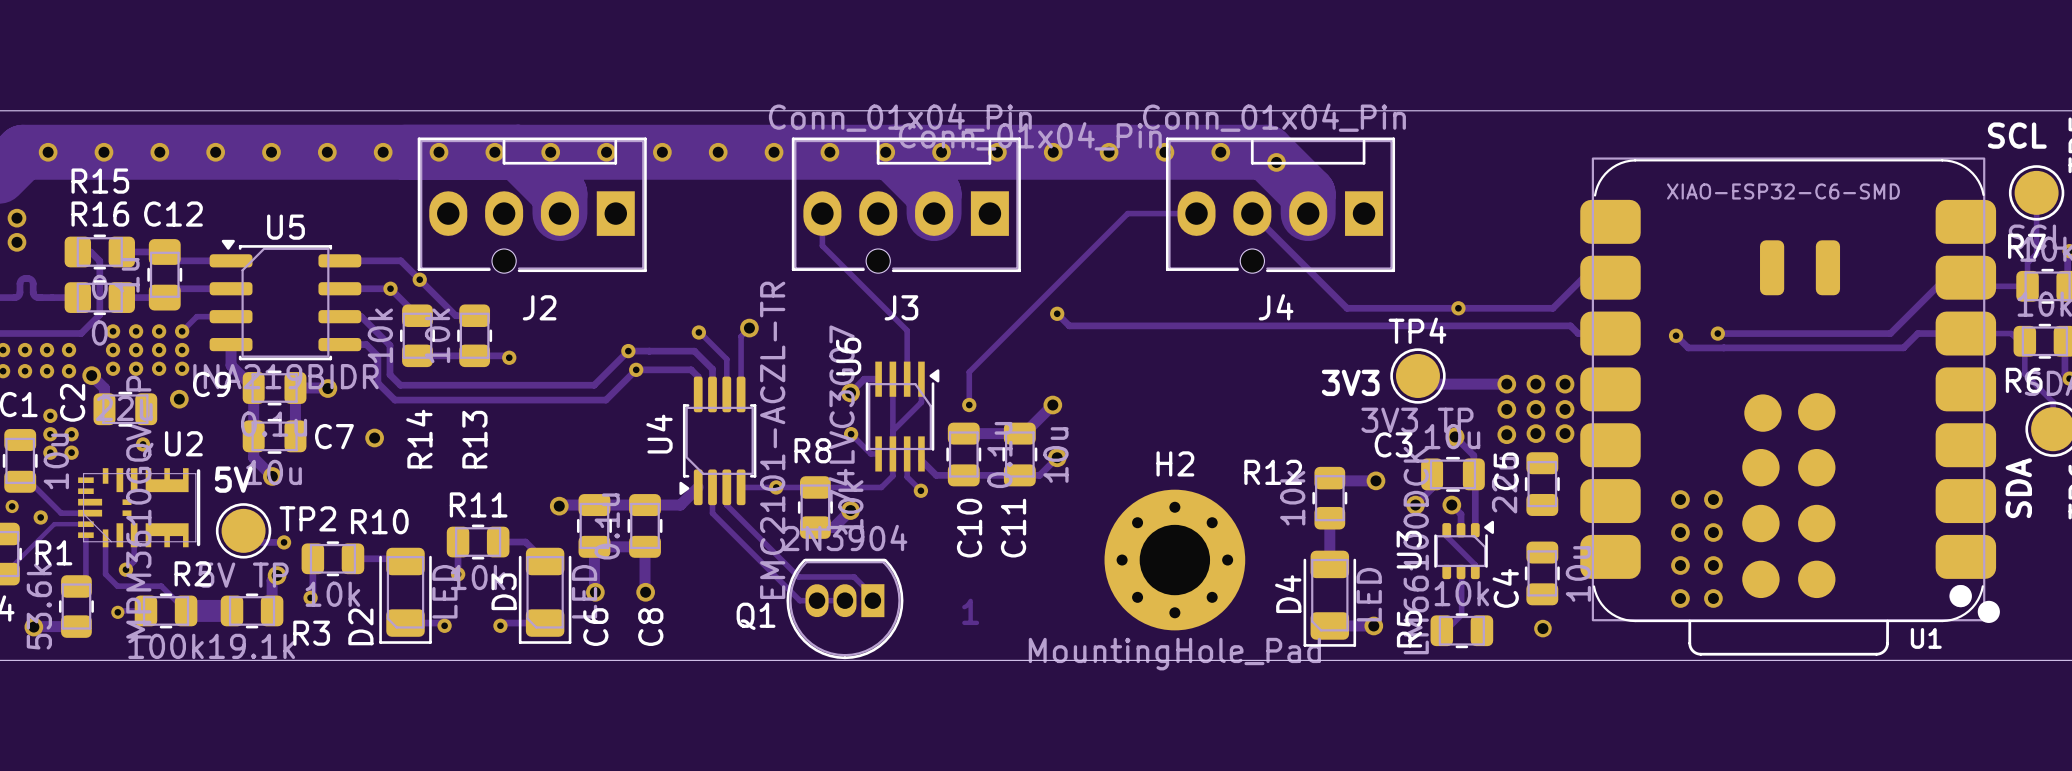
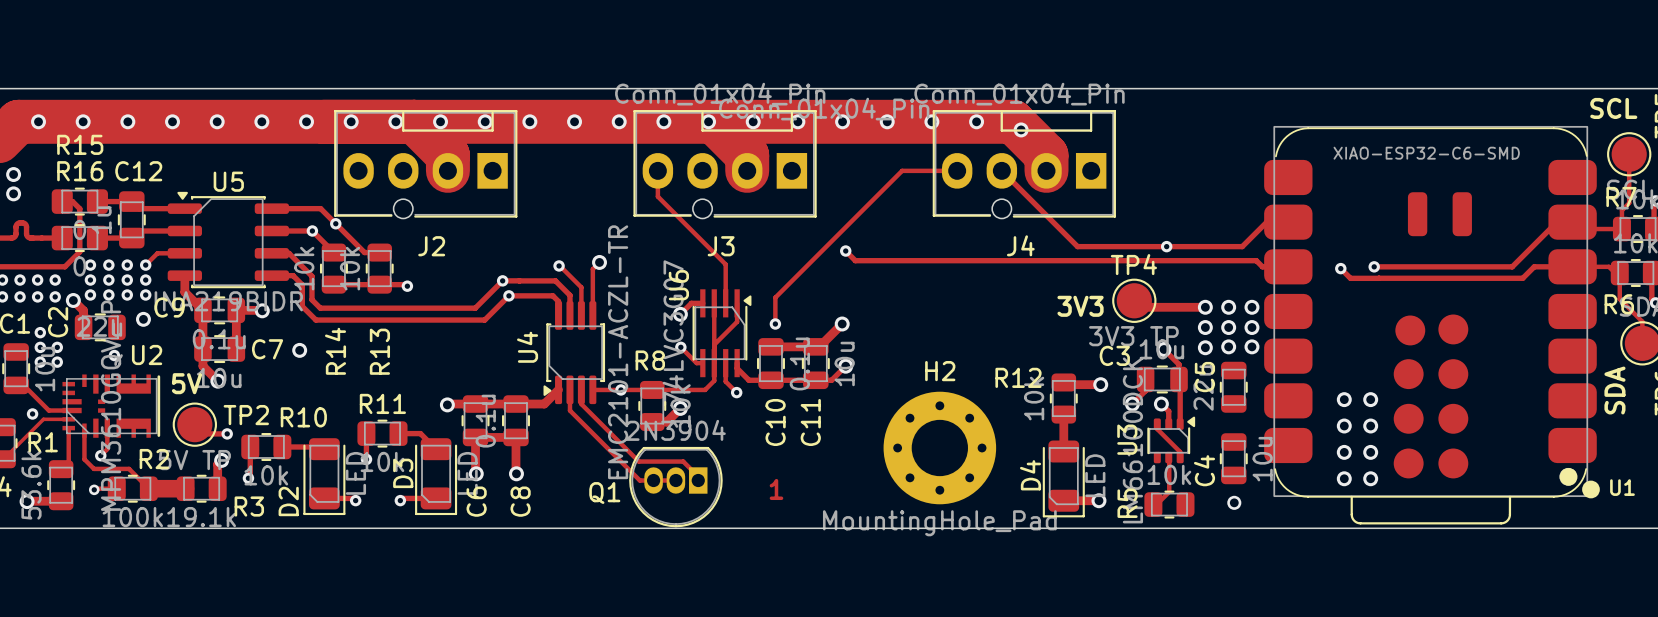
via: (12, 506) -> none
U1 name position: U1 (1926, 638) -> U1 (1622, 487)

